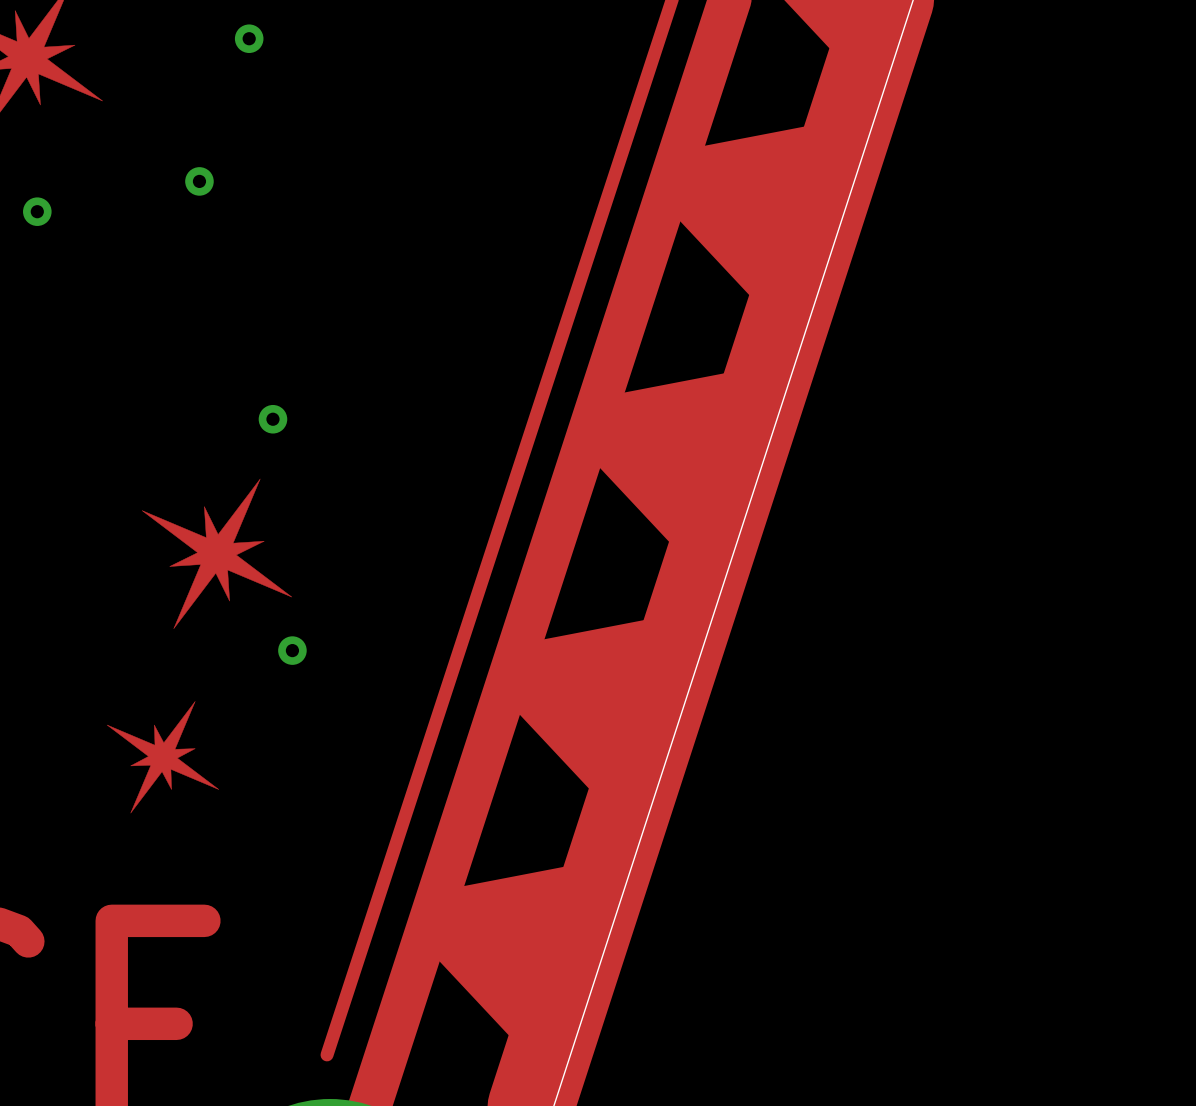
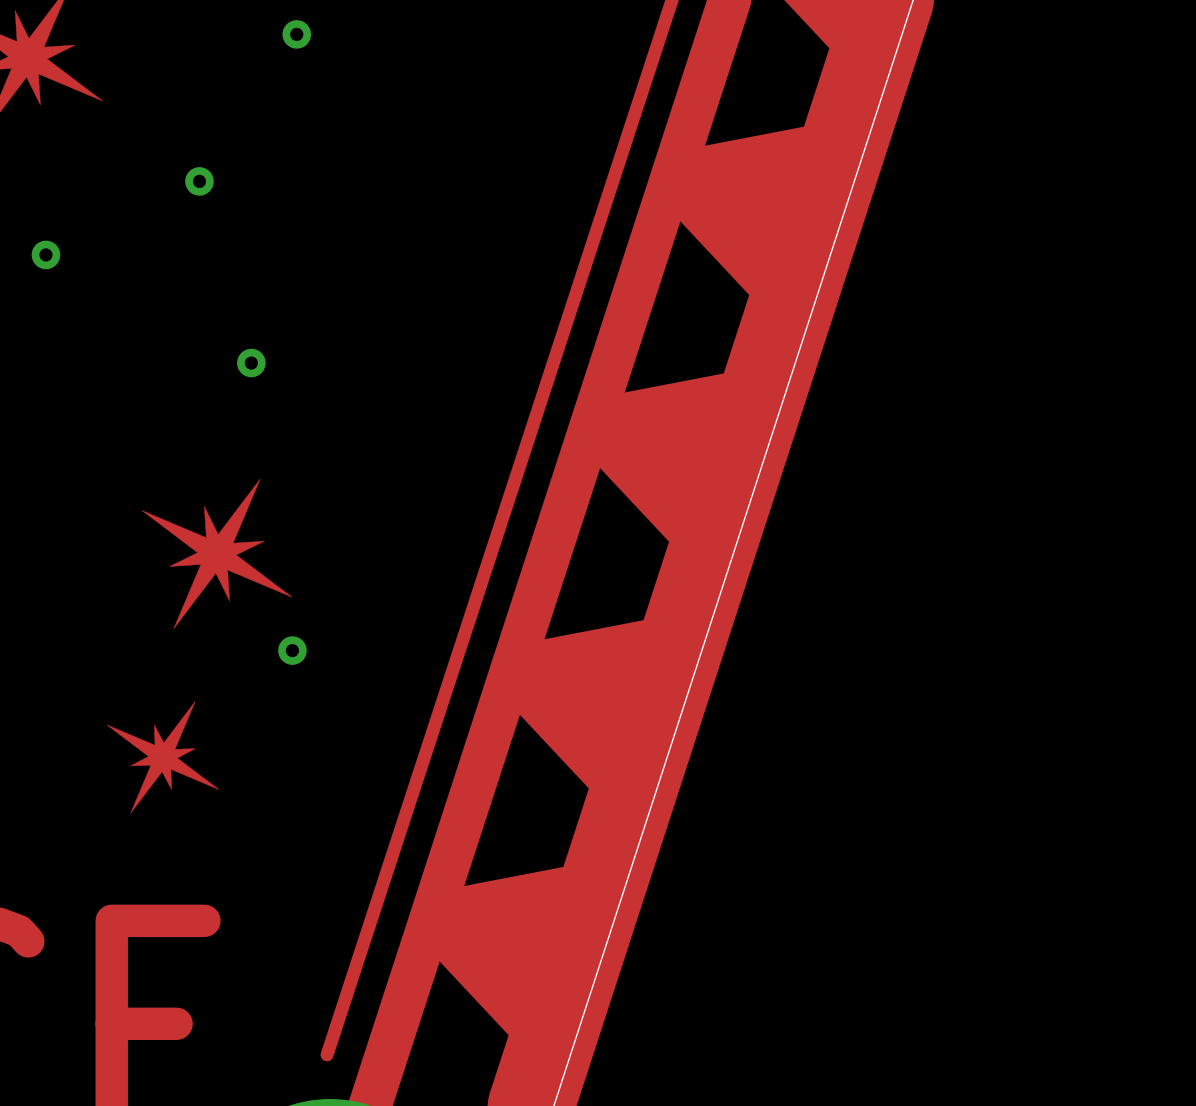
via position: (249, 38) -> (296, 34)
via position: (37, 211) -> (45, 254)
via position: (272, 419) -> (251, 363)

